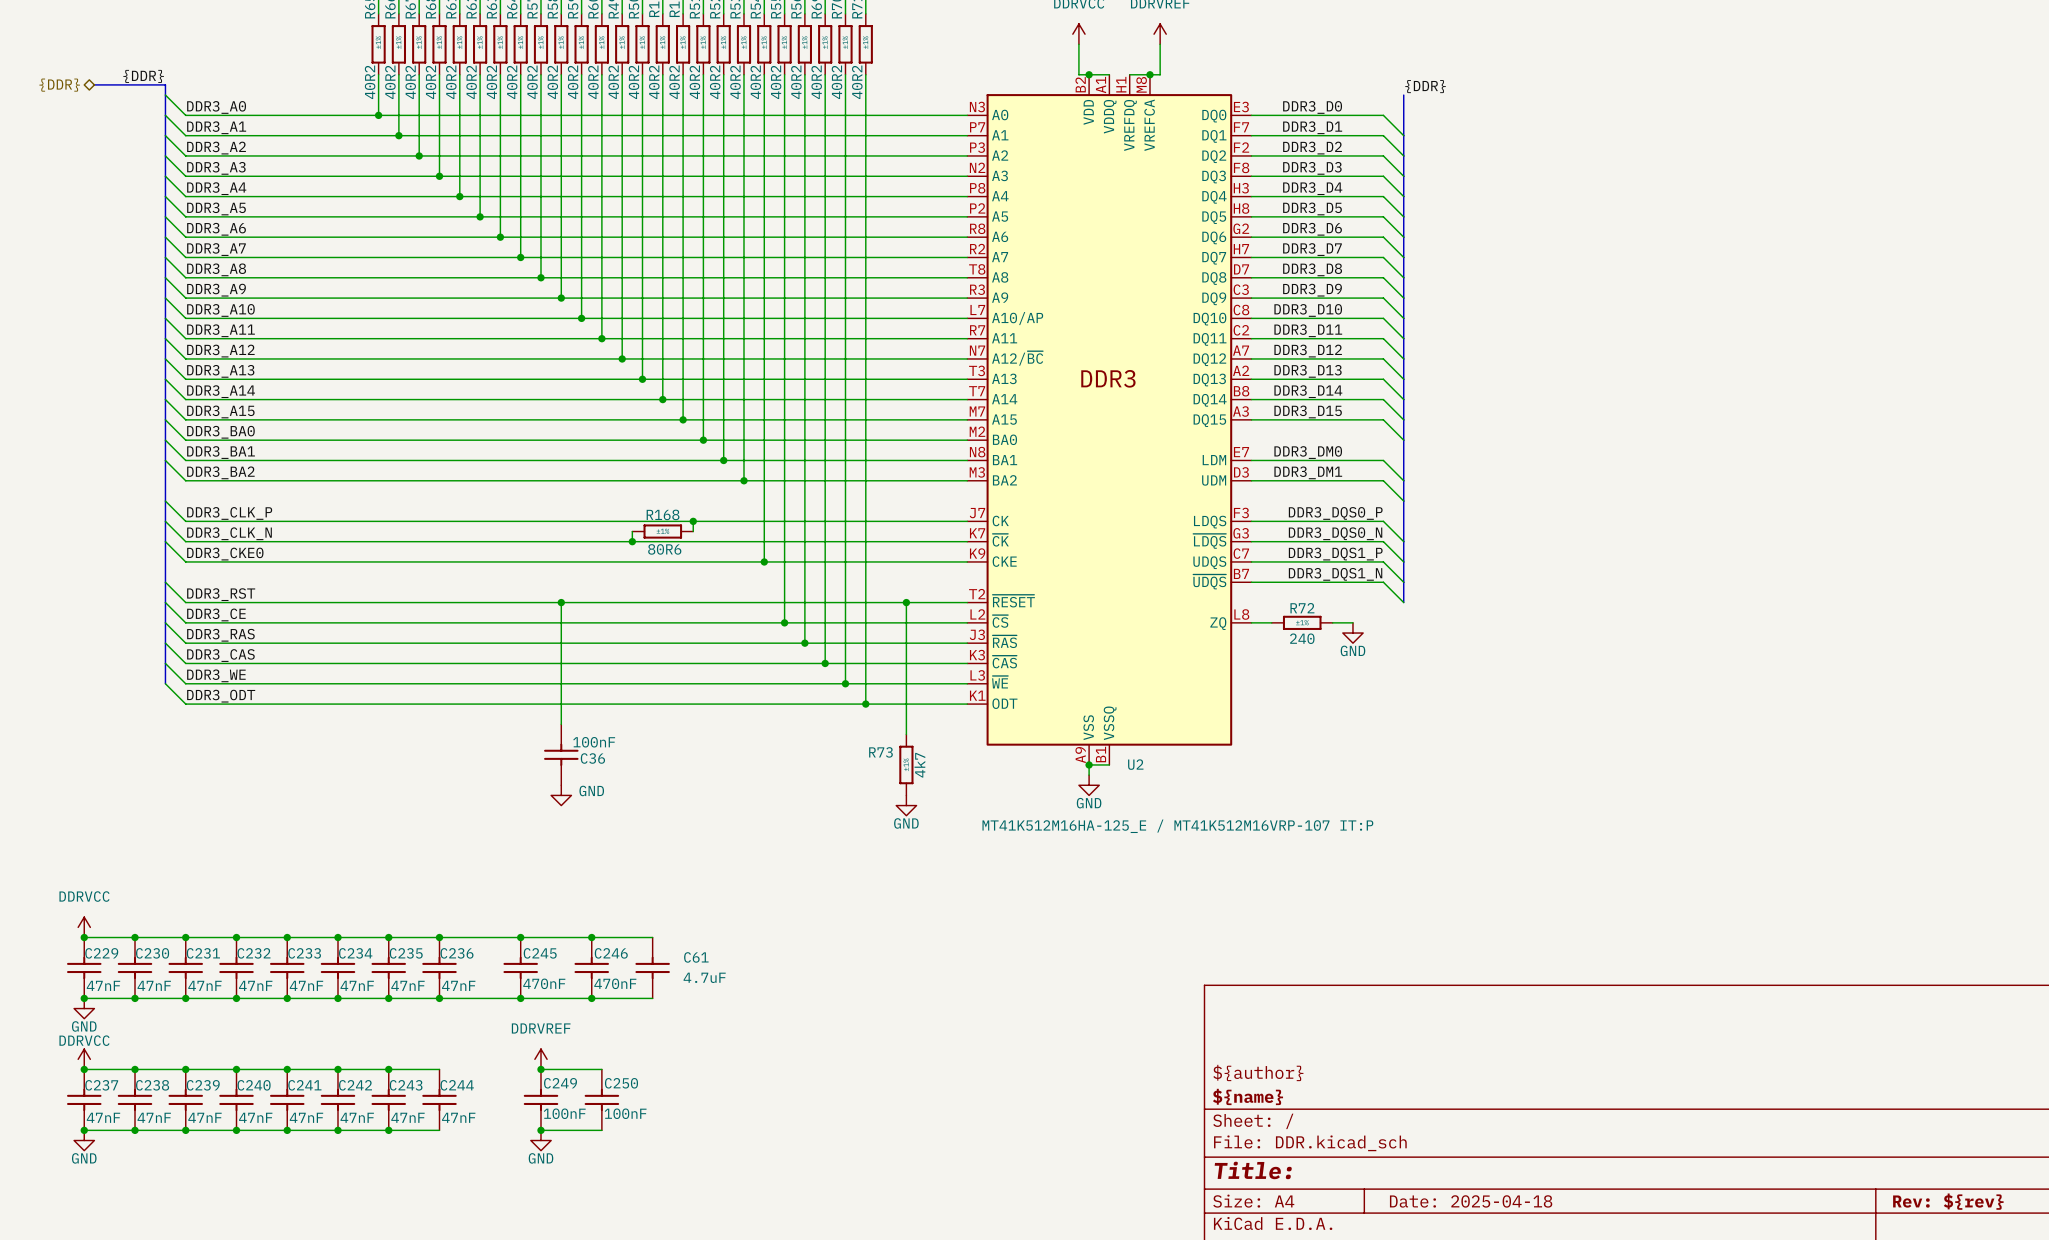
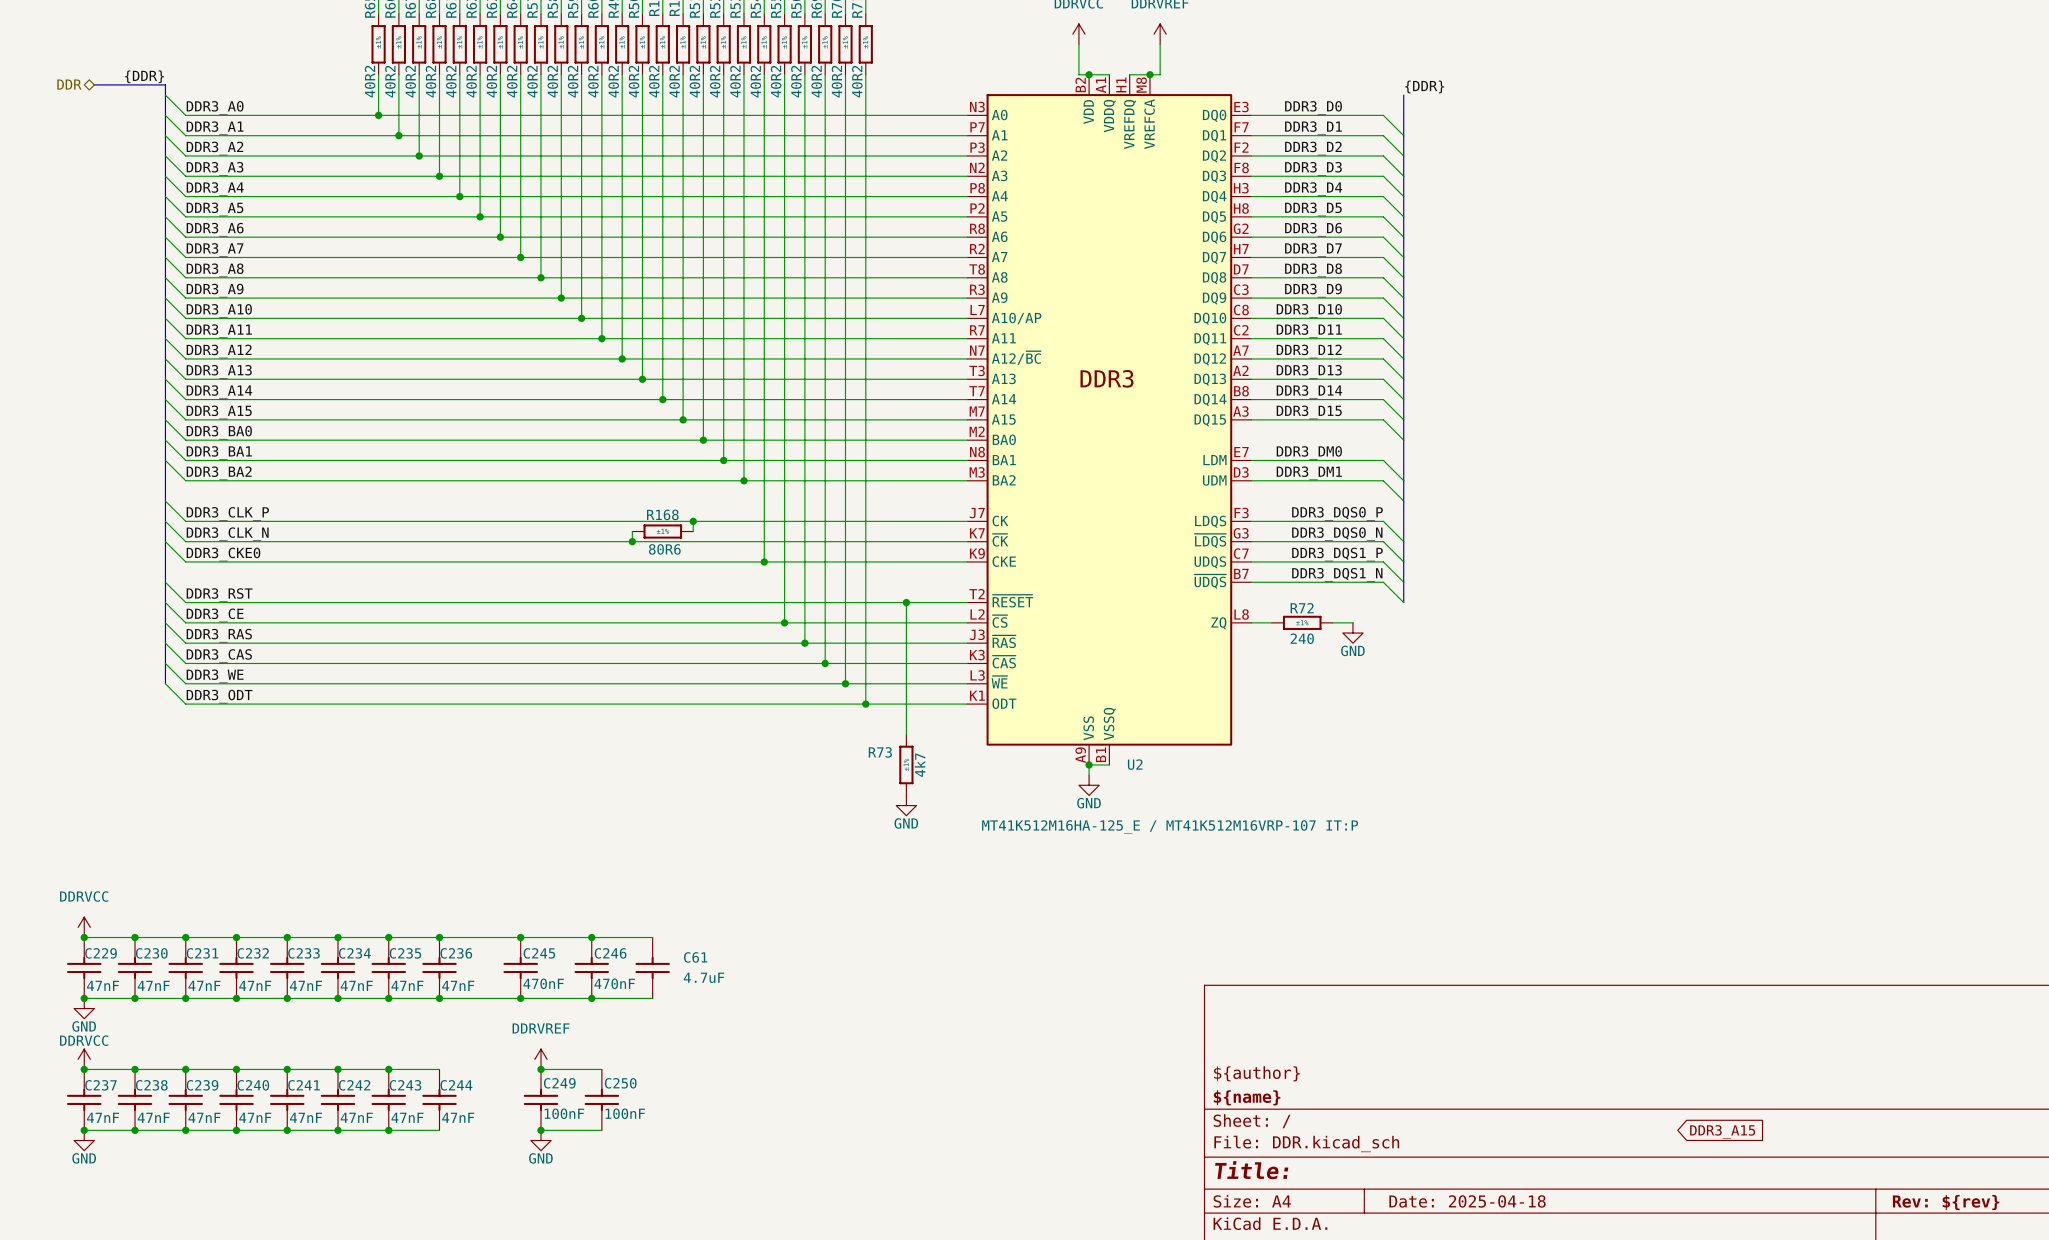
hierarchical label: {DDR} (59, 85) -> DDR (69, 84)
wire: (561, 602) (561, 724) -> none
junction: (561, 602) -> none
C36: (561, 754) -> none
power symbol: GND (561, 795) -> none
global label: none -> DDR3_A15 (1722, 1131)

